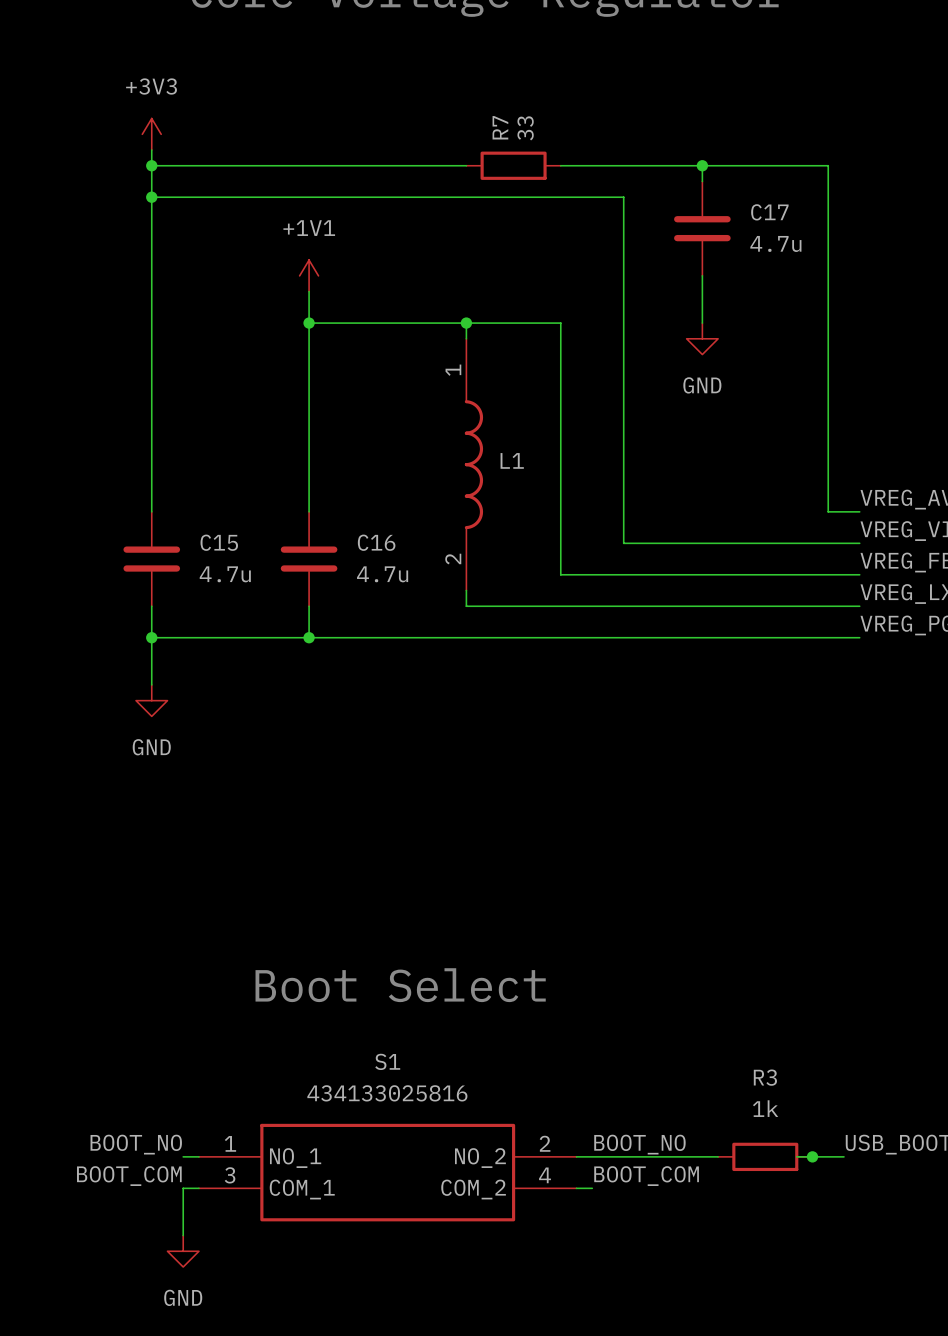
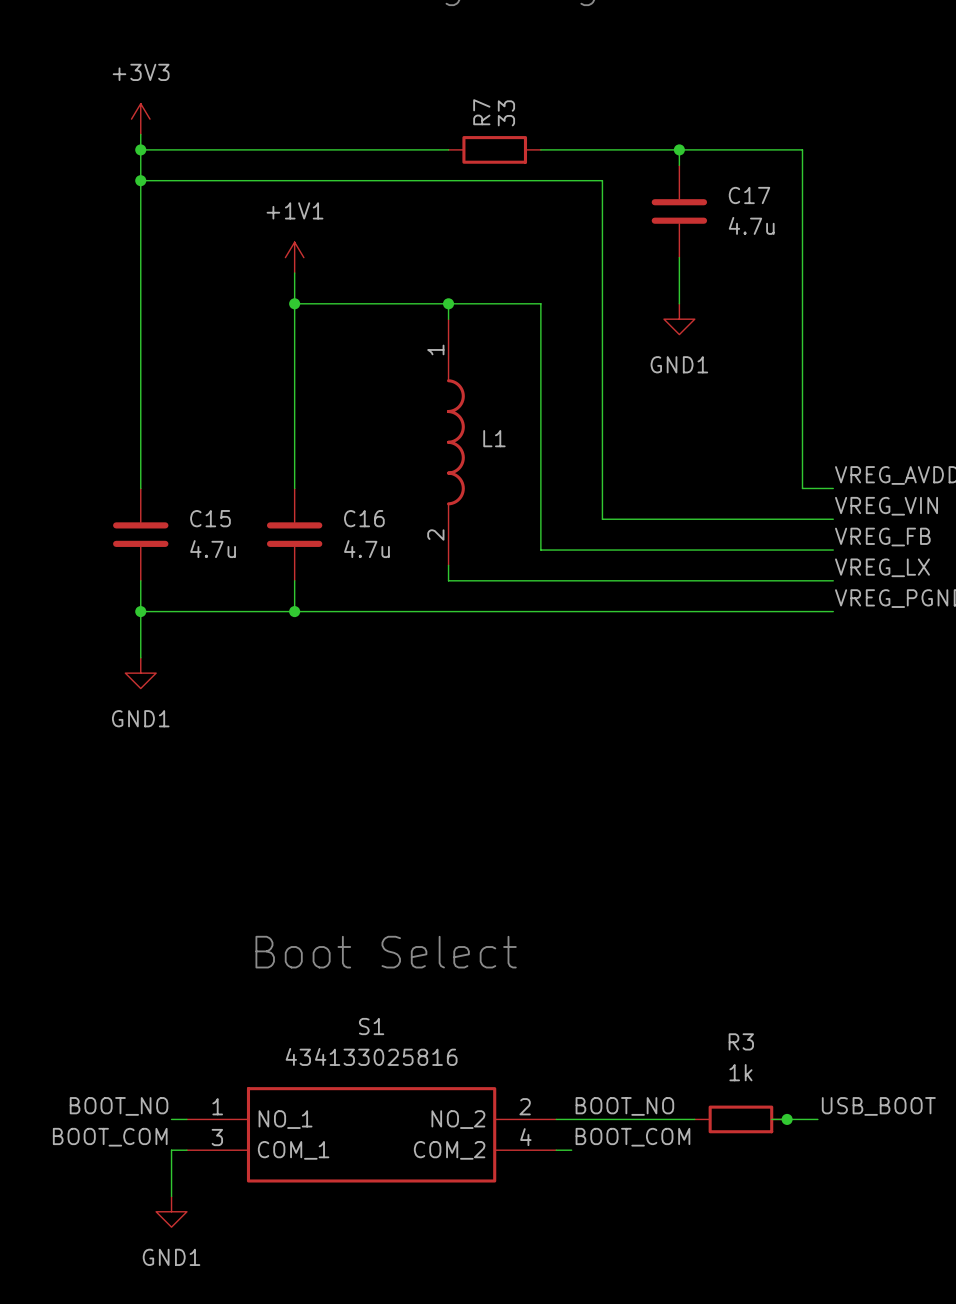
power symbol: GND (702, 338) -> GND1 (679, 319)
power symbol: GND (151, 700) -> GND1 (140, 673)
power symbol: GND (183, 1251) -> GND1 (171, 1211)

